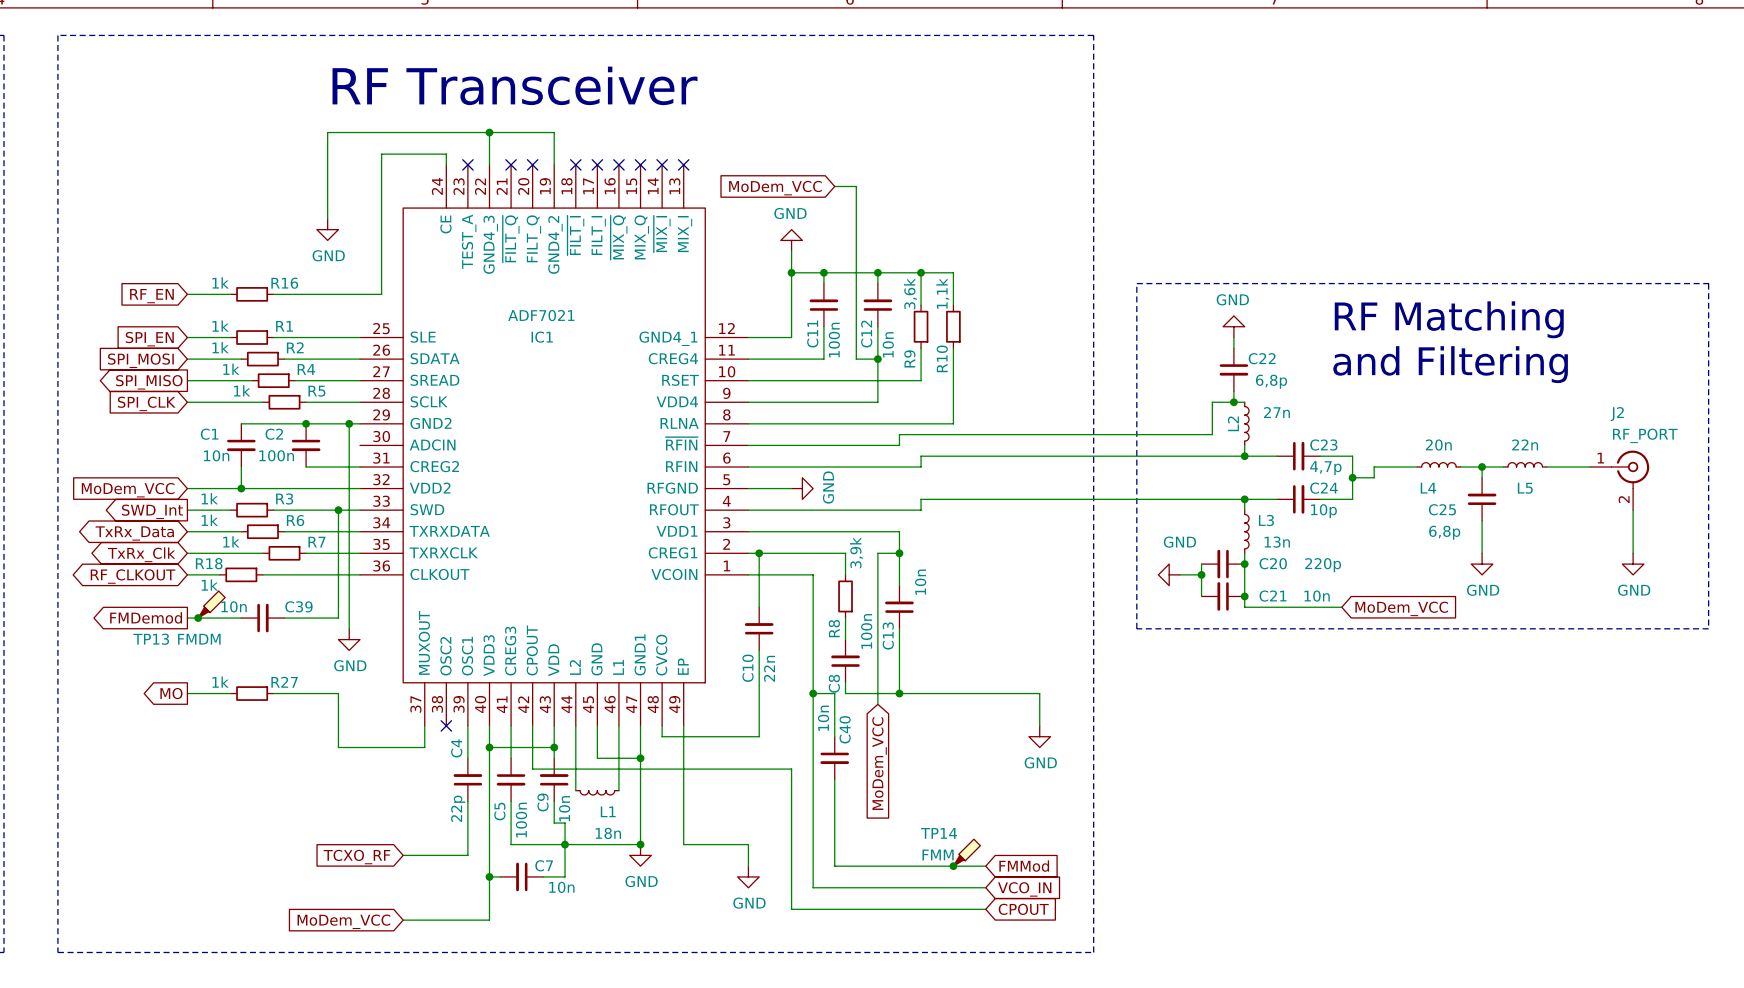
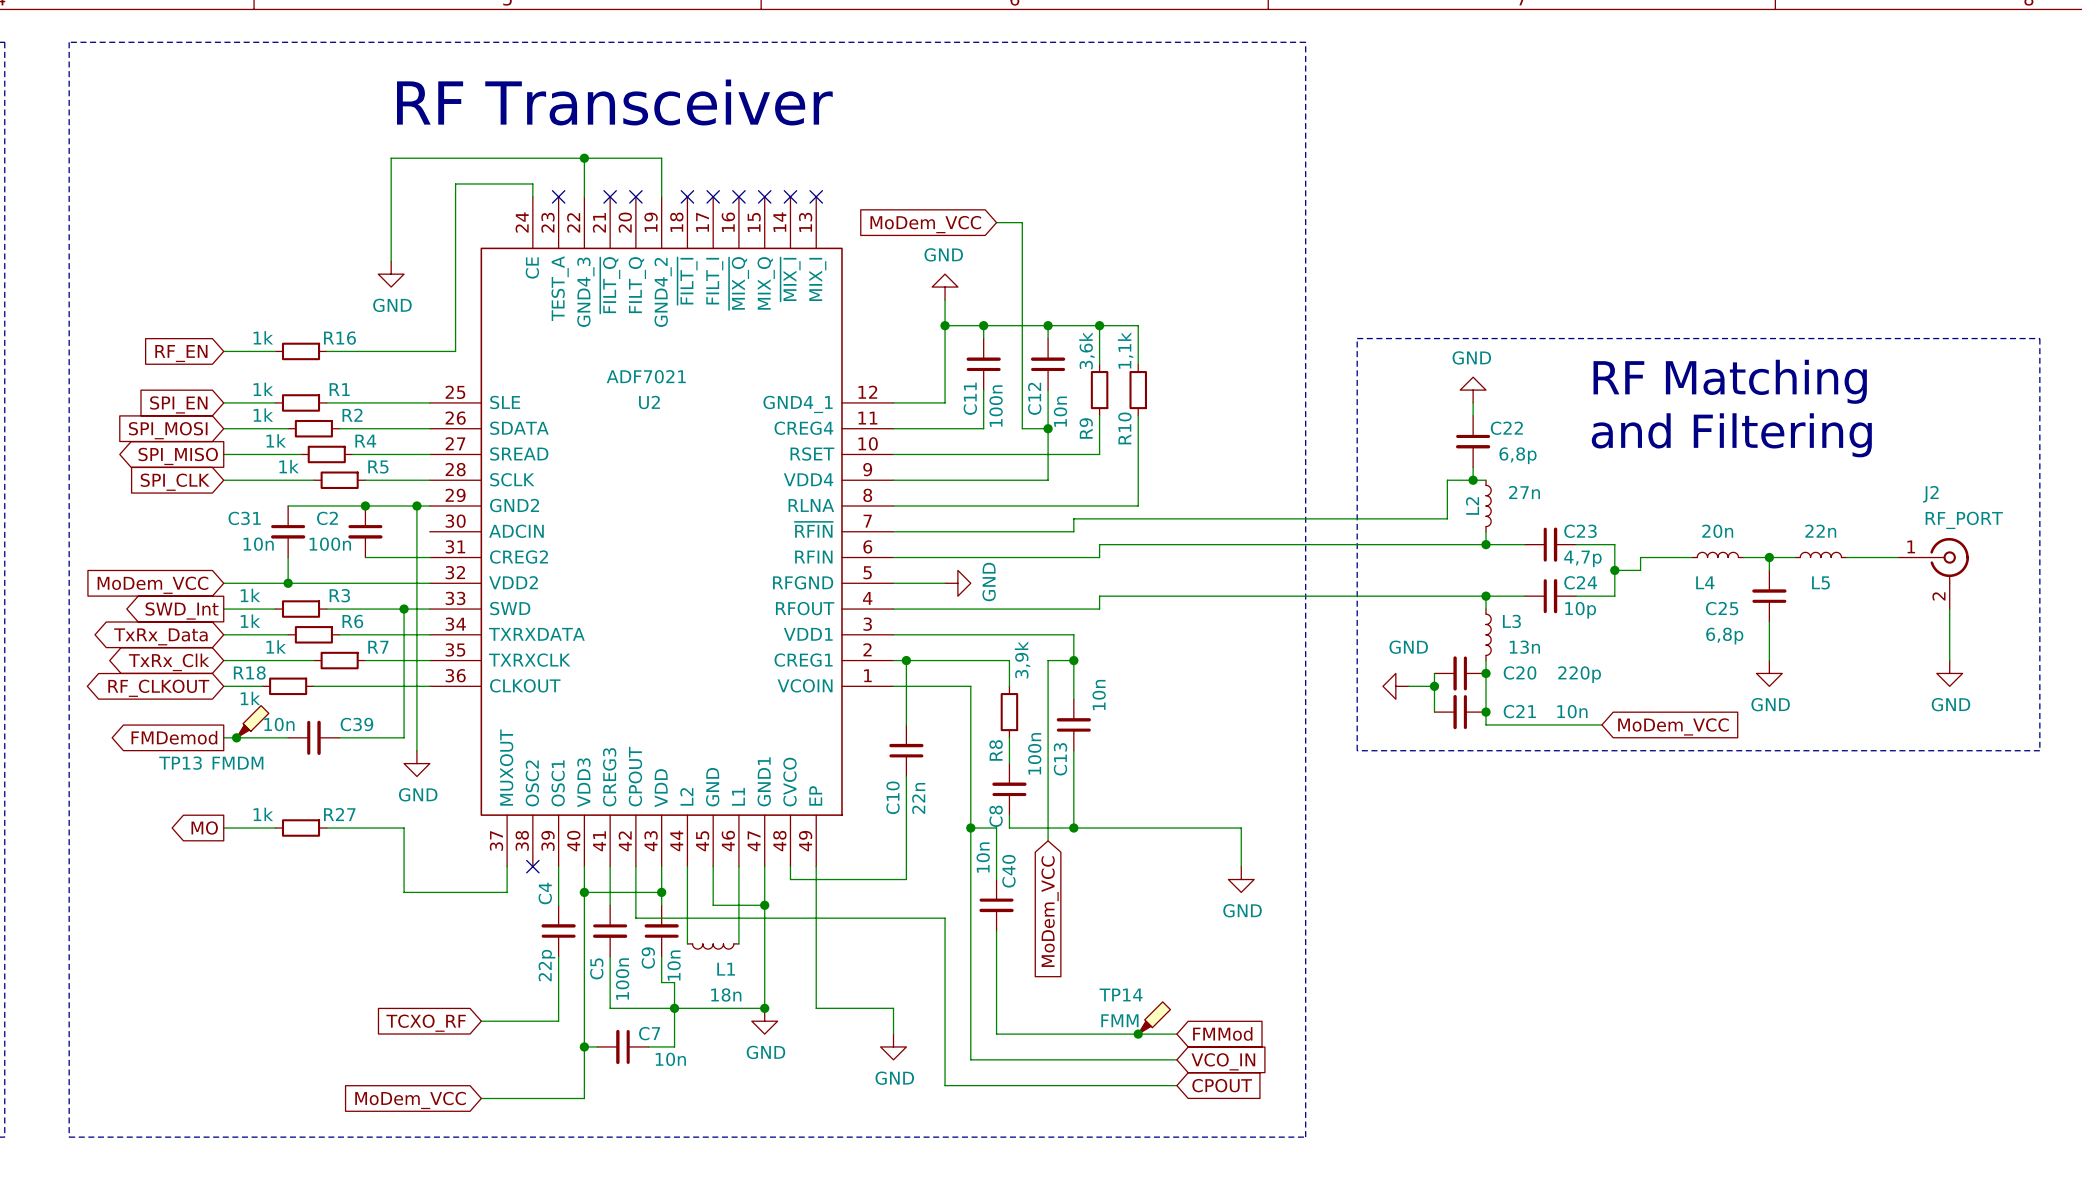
IC1 name: IC1 (542, 337) -> U2 (649, 402)
C1 name: C1 (209, 434) -> C31 (244, 518)

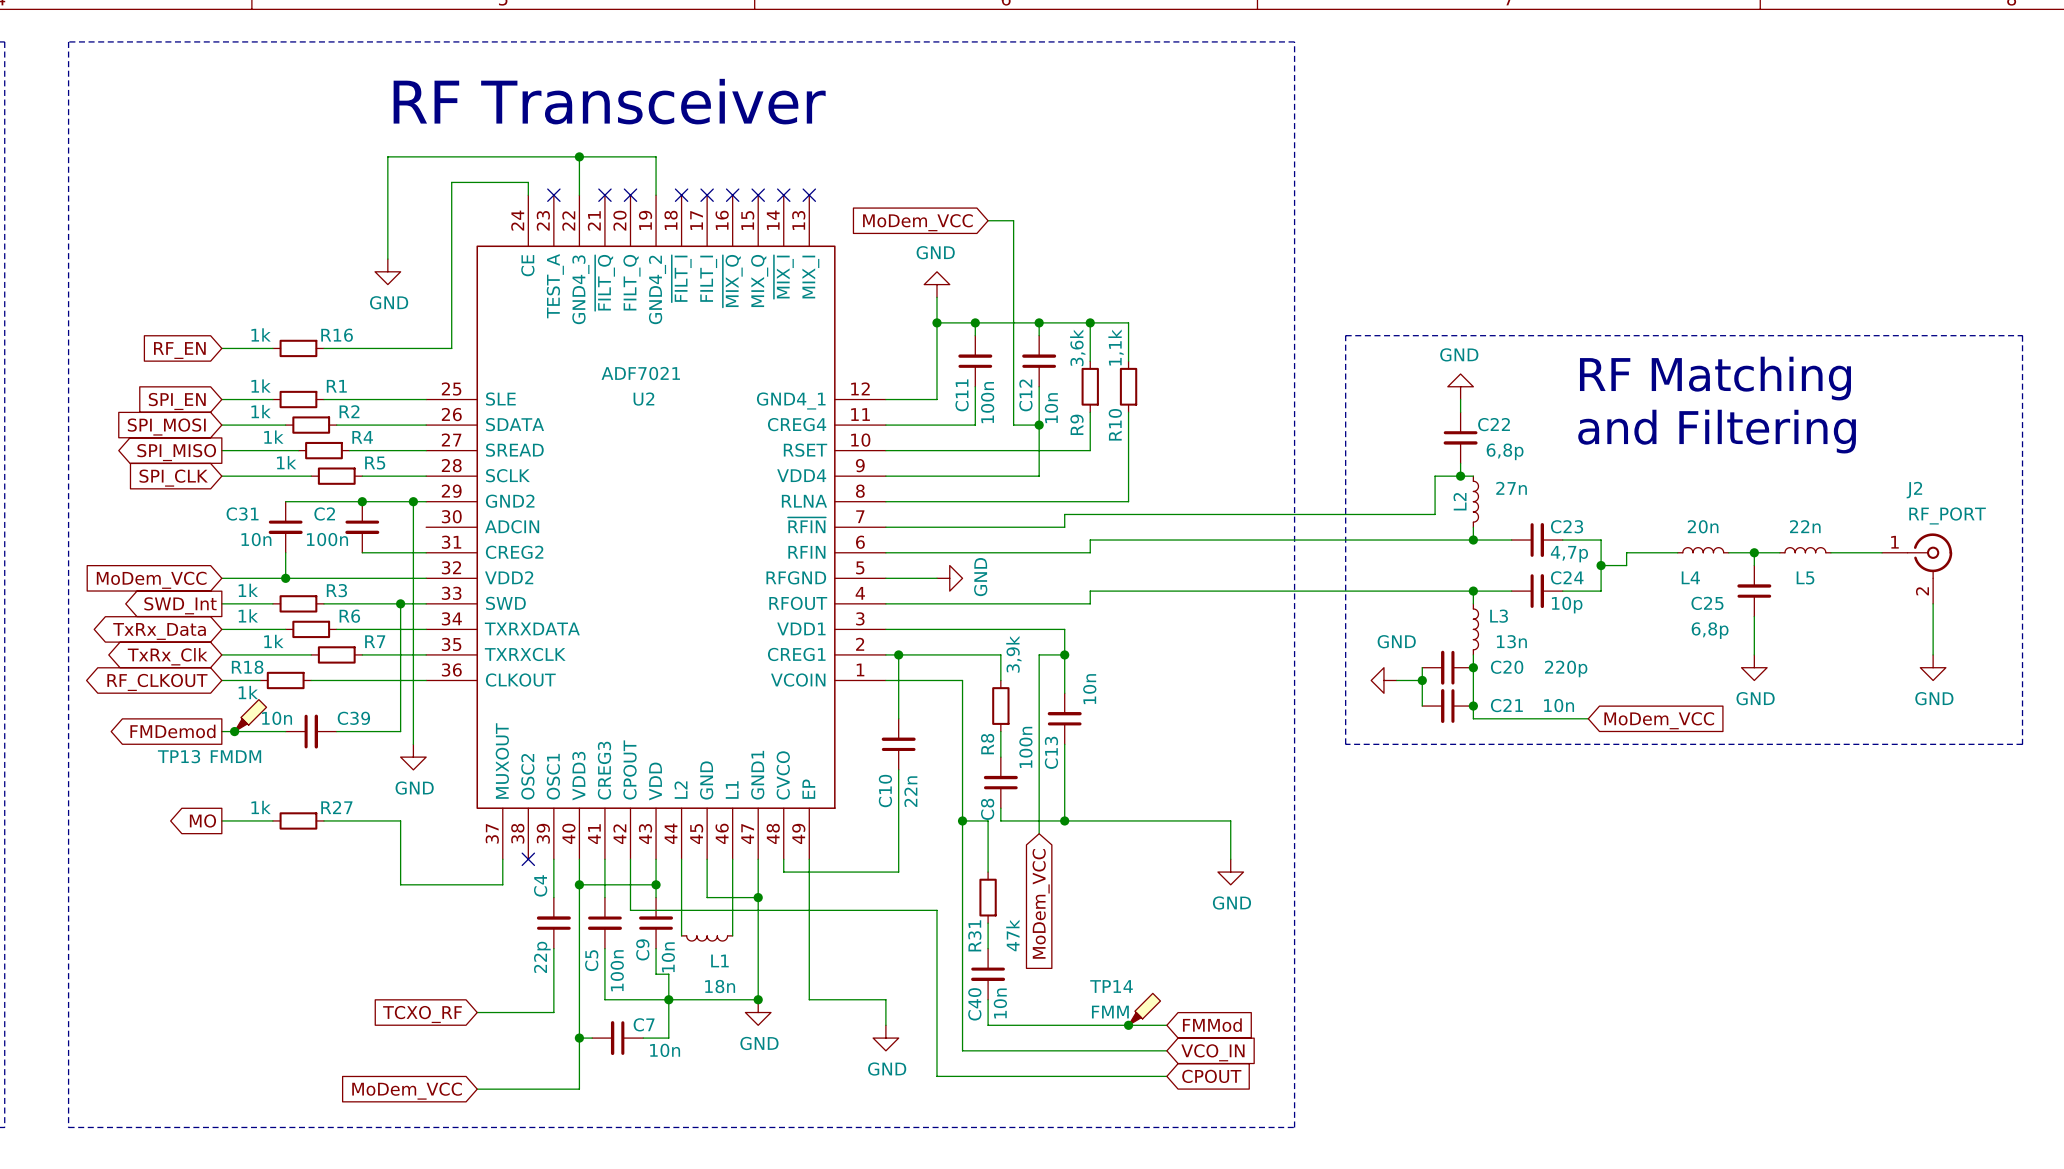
C40 value position: 10n (983, 857) -> 10n (1000, 1003)
C40 name position: C40 (1008, 871) -> C40 (974, 1004)
C40 position: (996, 905) -> (988, 974)
R31: none -> 47k (988, 897)

